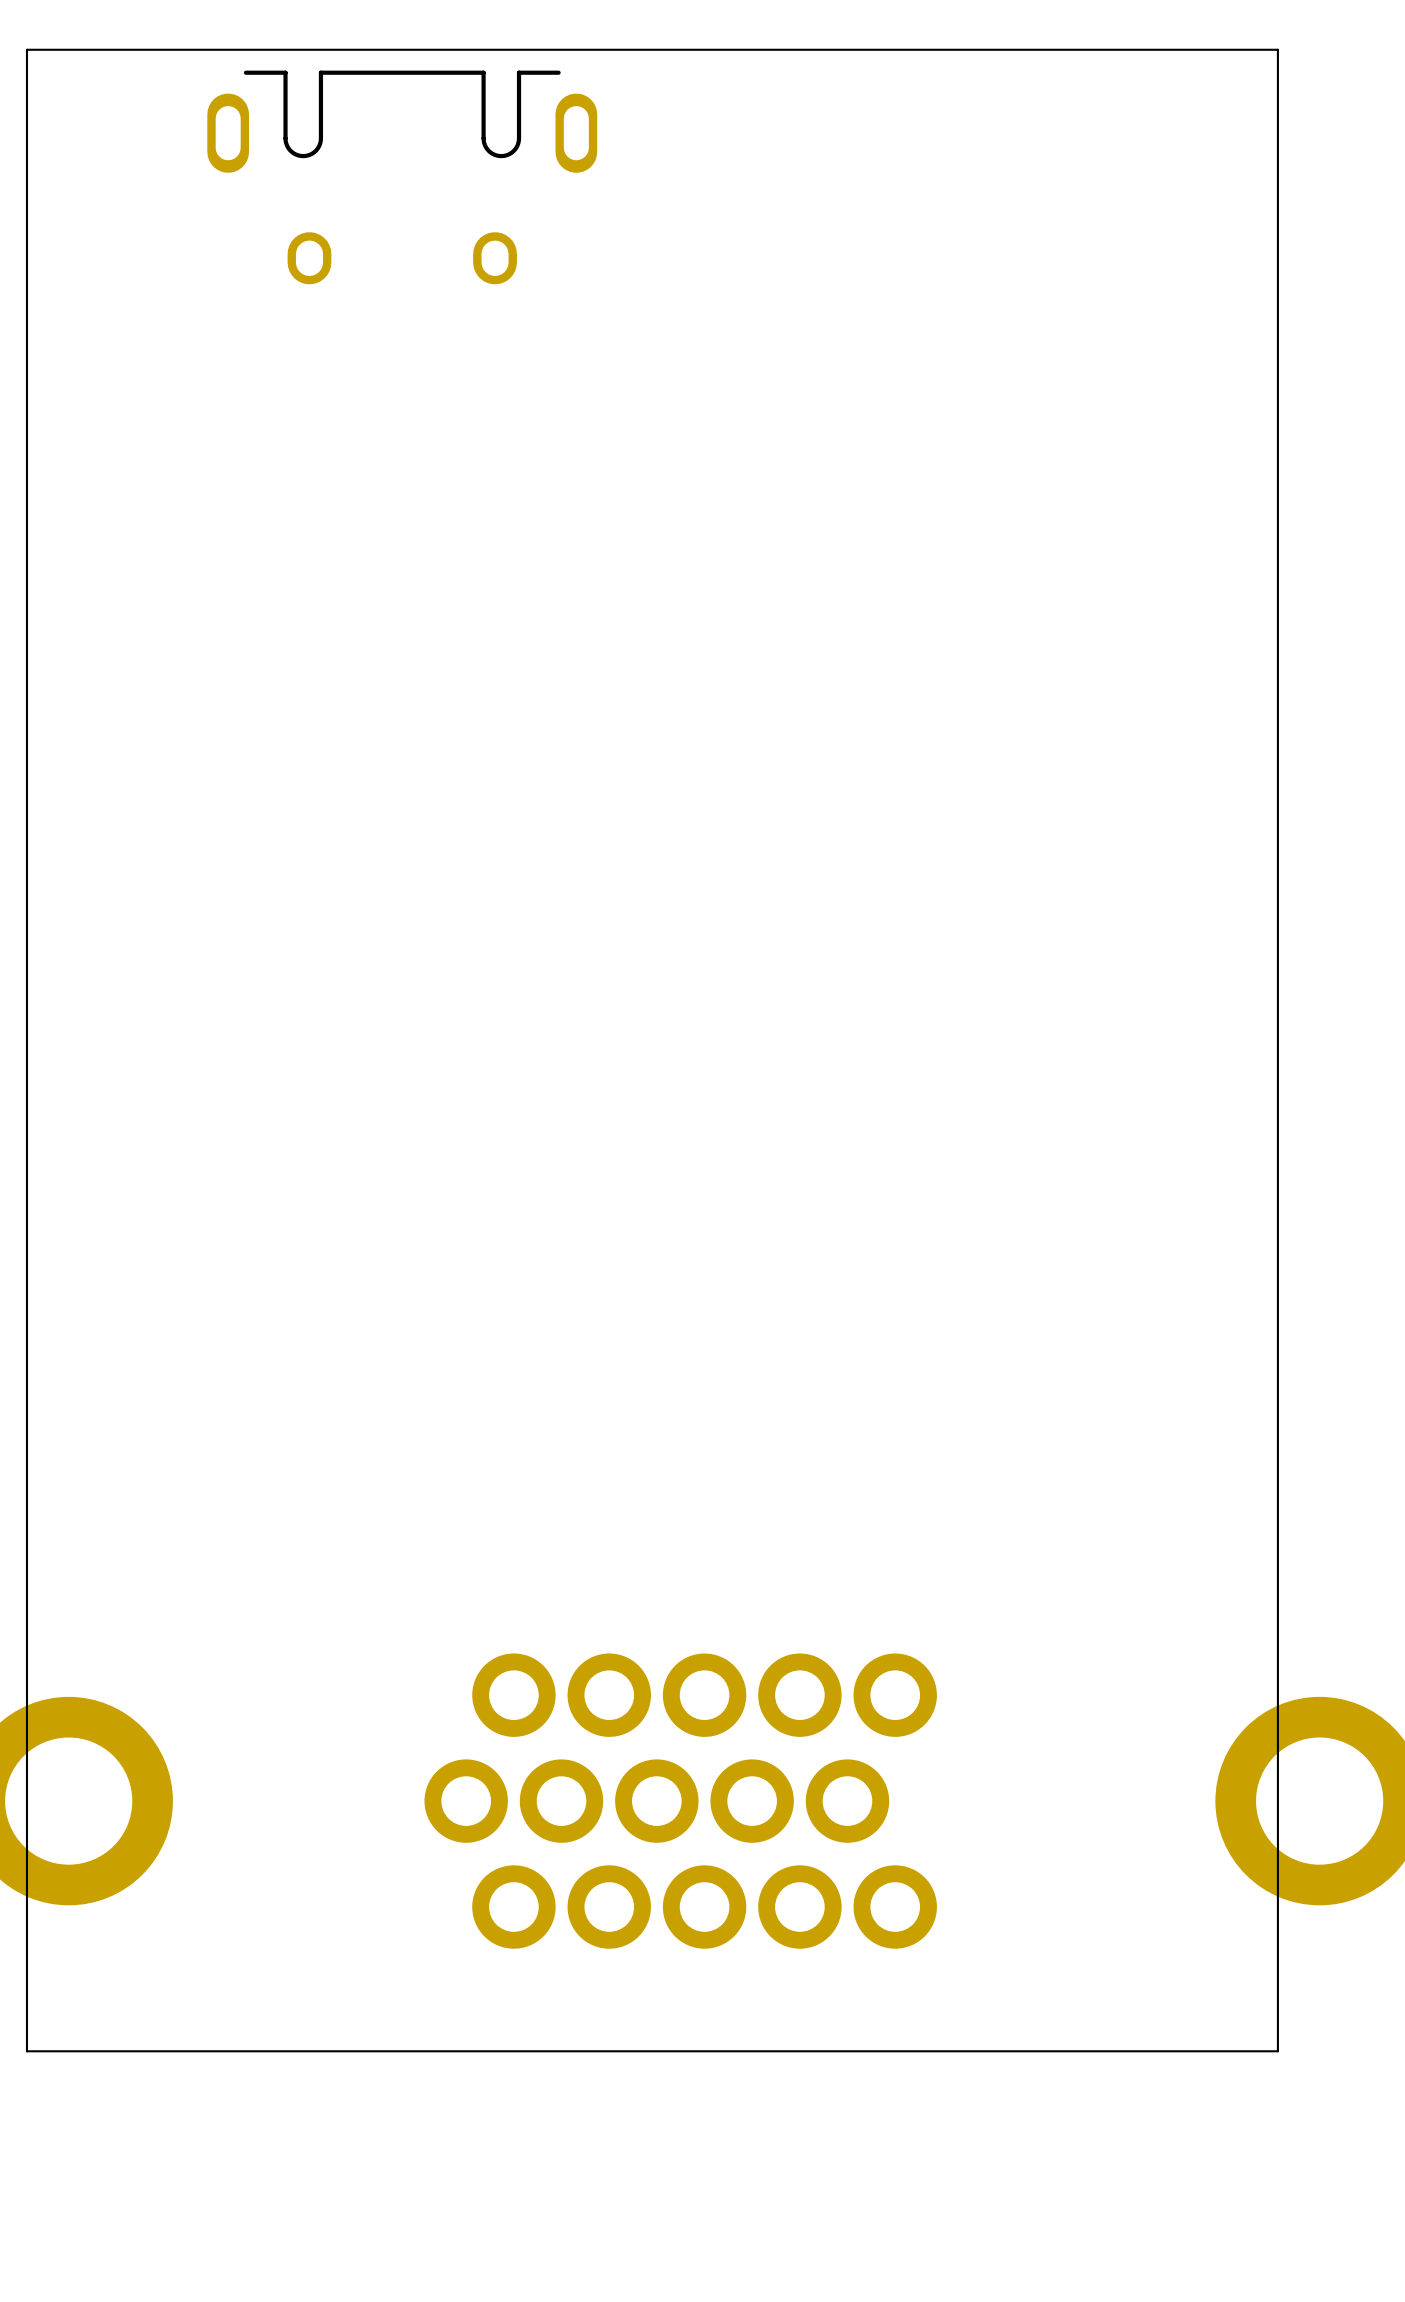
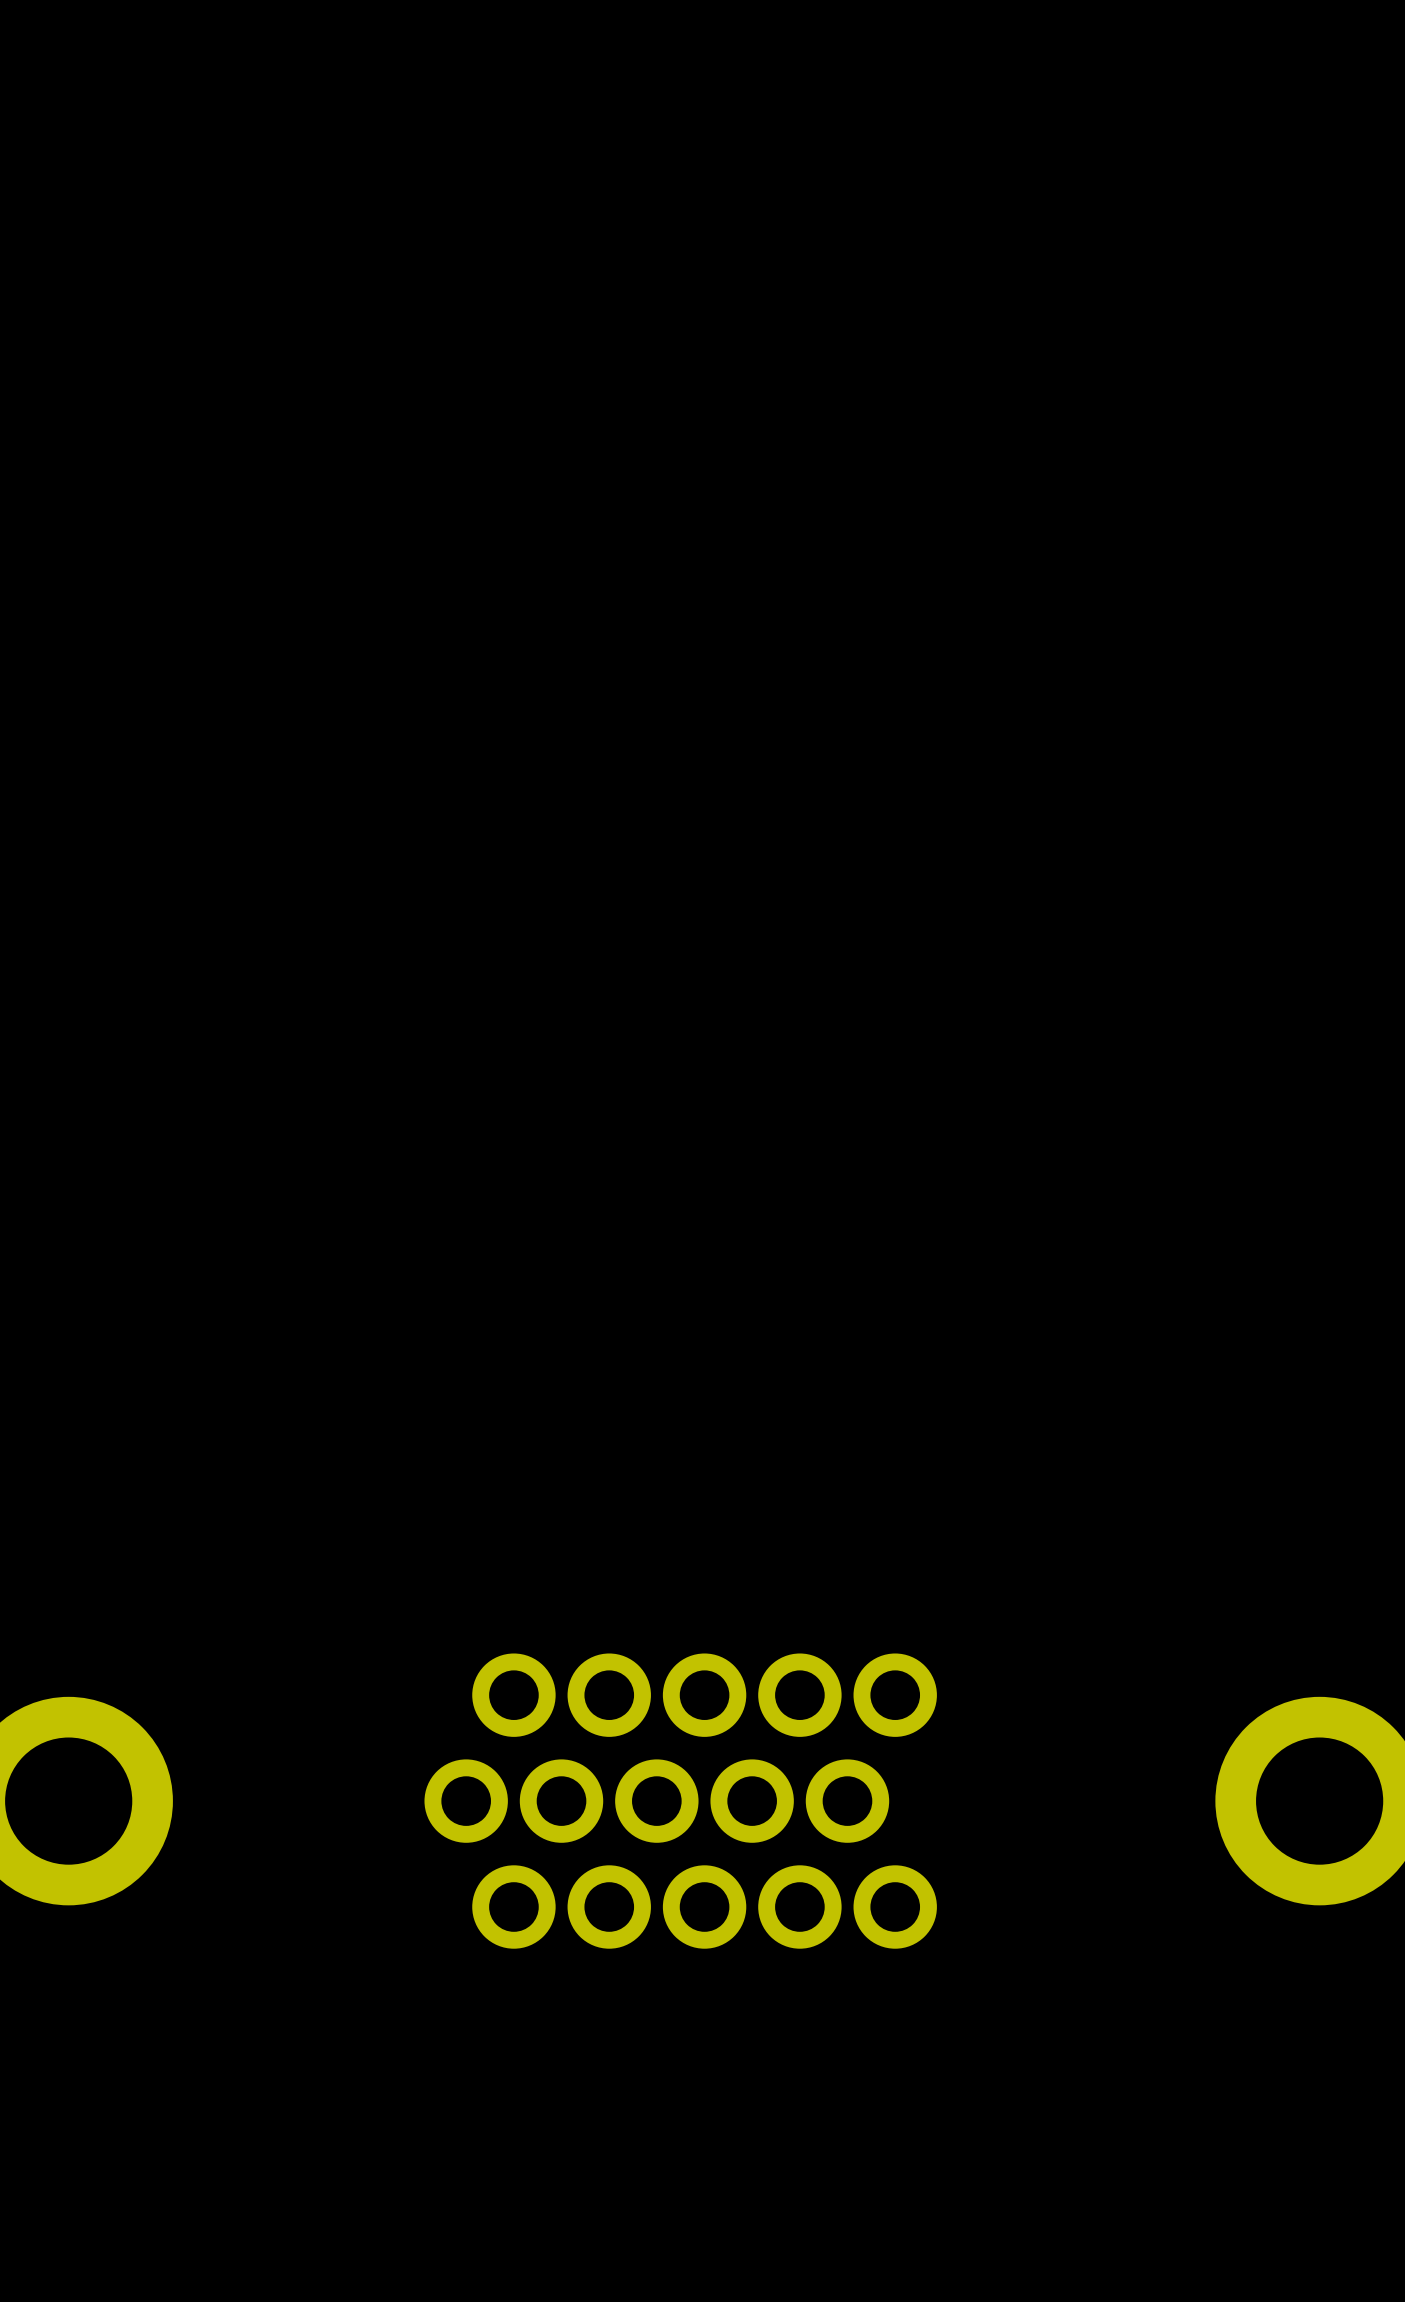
board edge: (1277, 49) (1277, 2051) (26, 2051) (26, 49) (1277, 49) -> none
part: (402, 177) -> none

